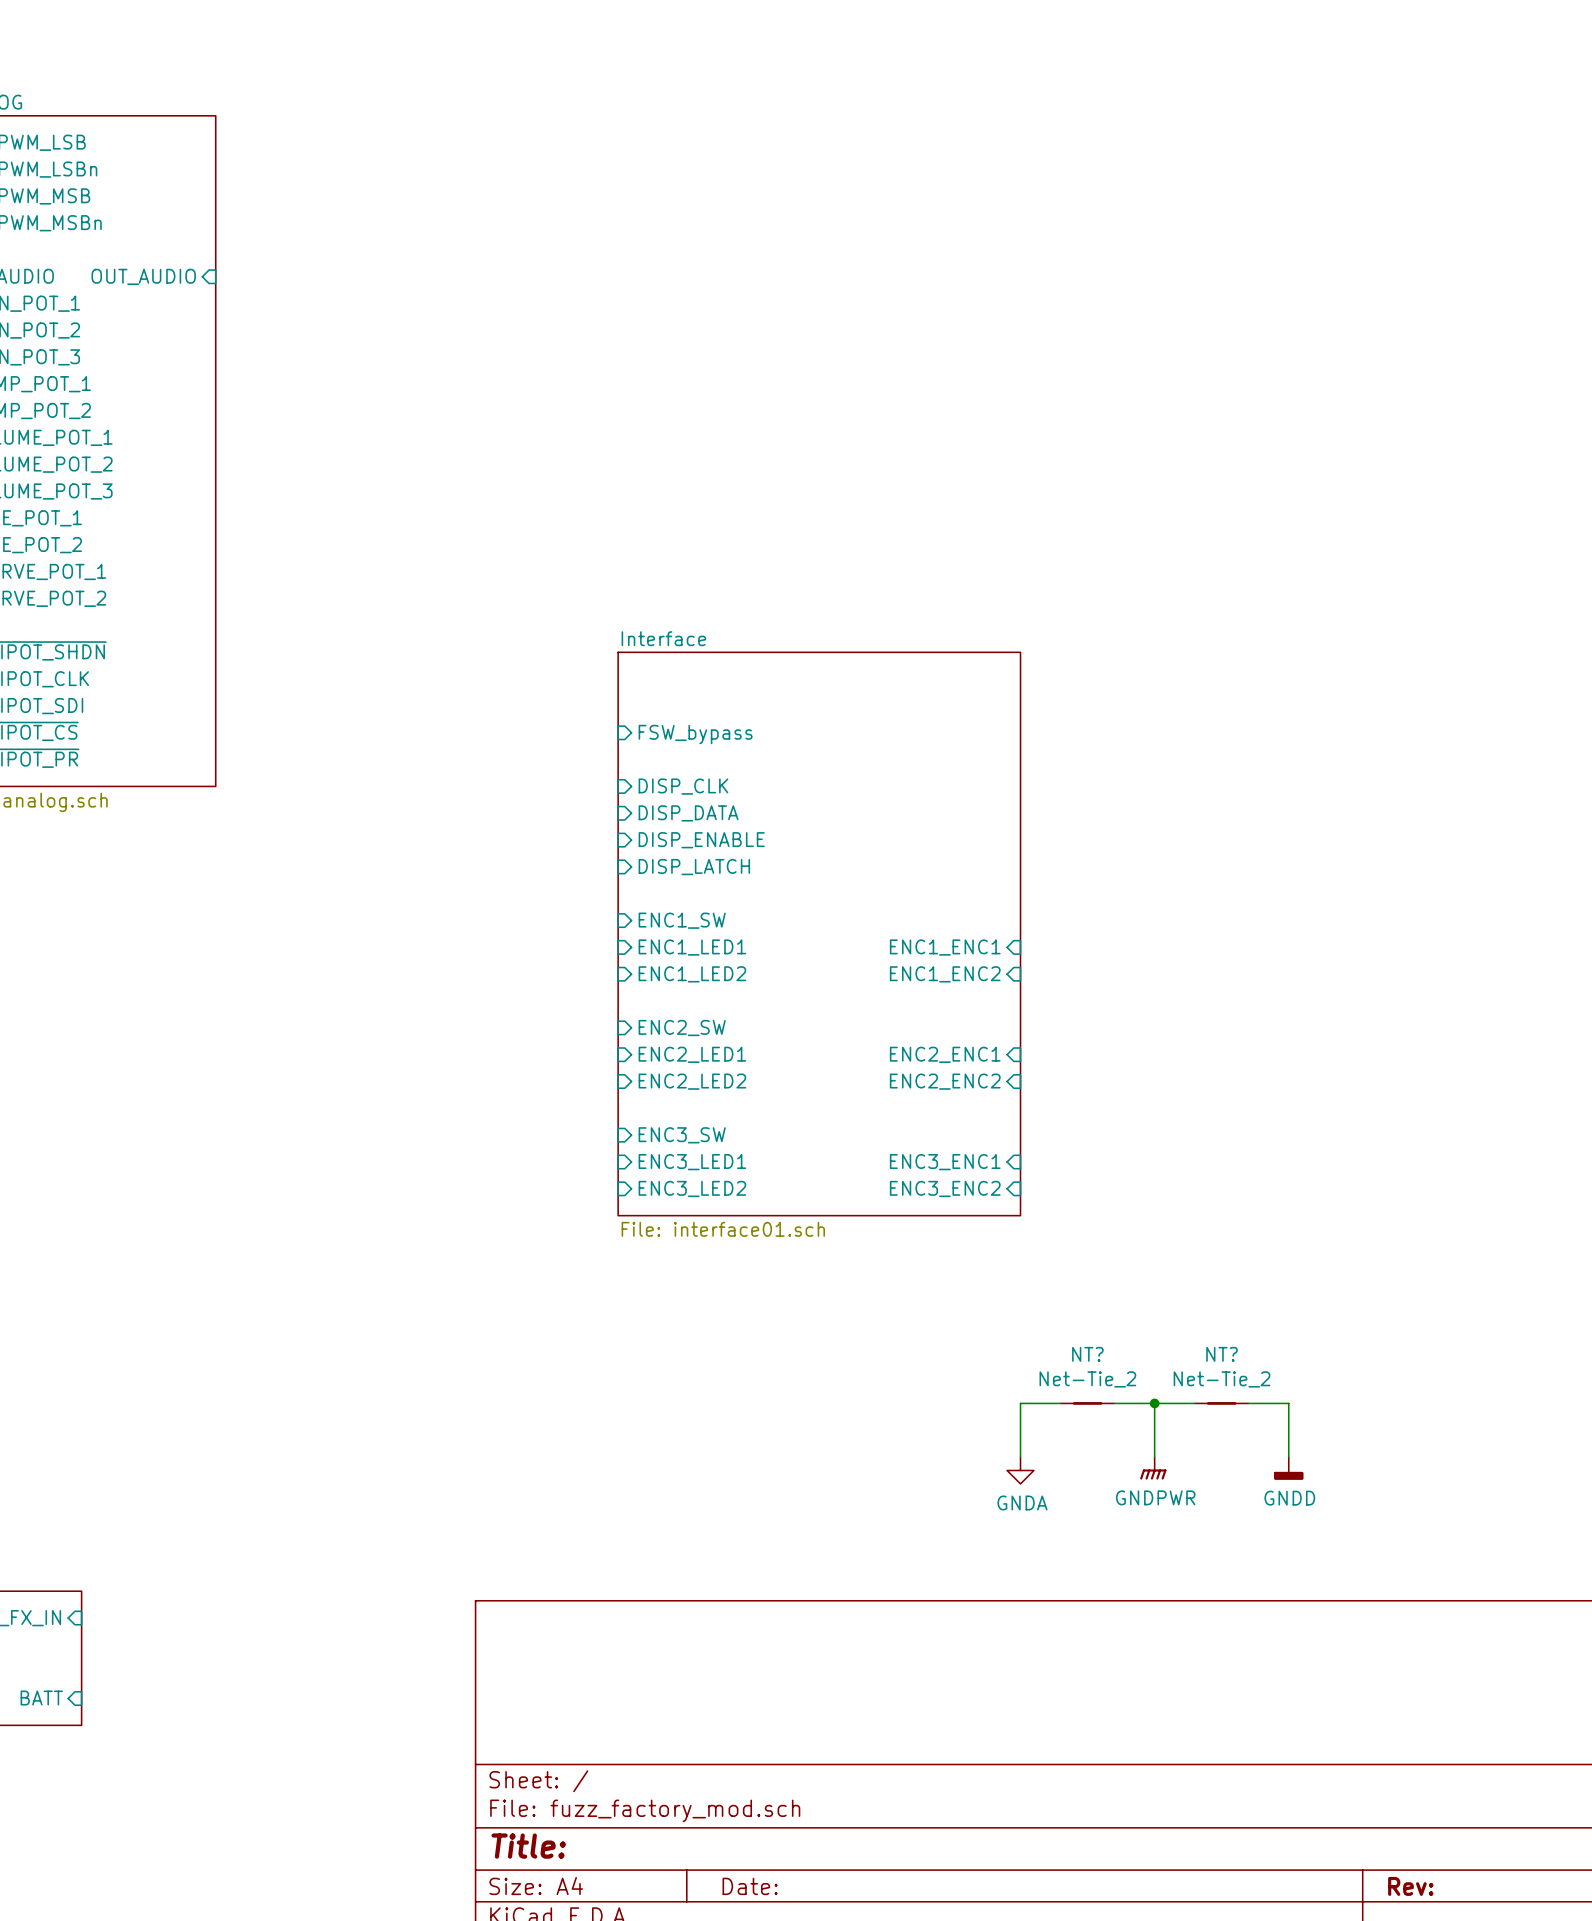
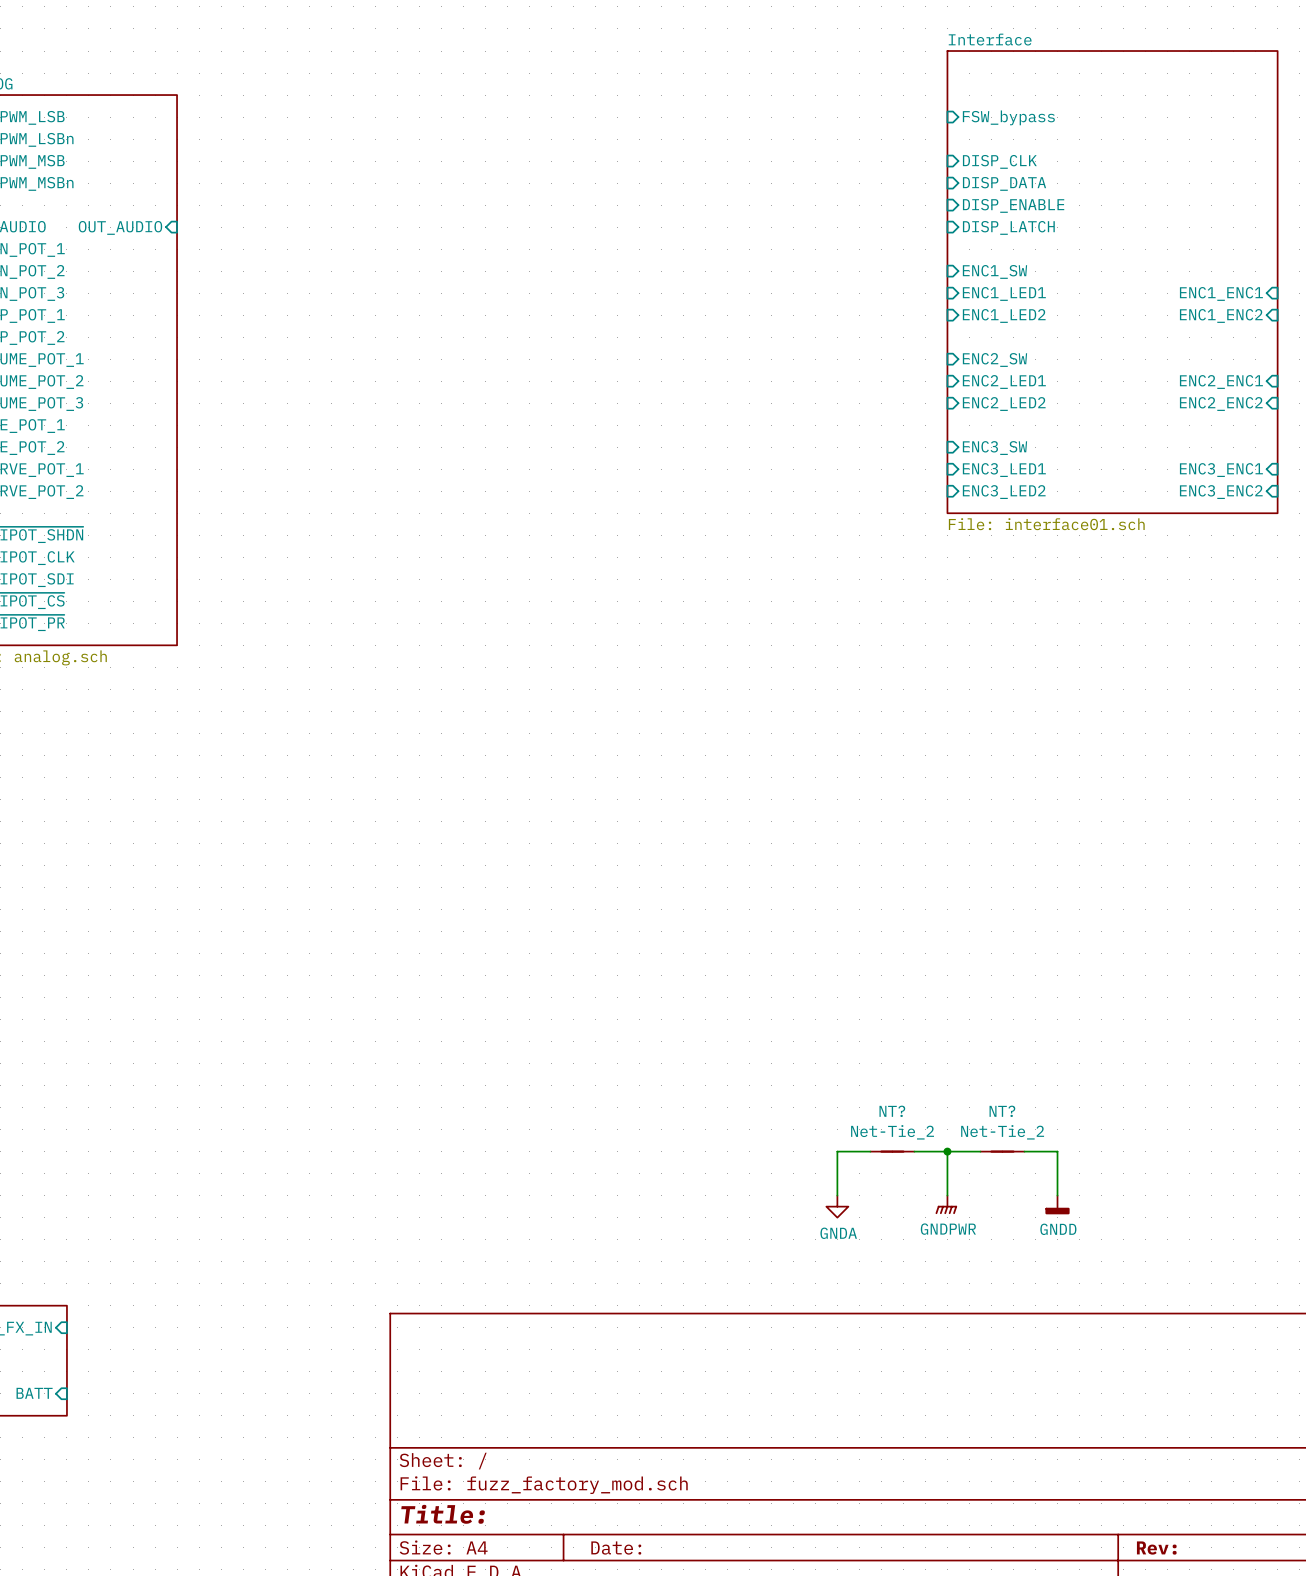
sheet pin: none -> FSW_bypass (1008, 117)
sheet pin: none -> DISP_CLK (999, 161)
sheet pin: none -> DISP_DATA (1004, 183)
sheet pin: none -> DISP_ENABLE (1013, 205)
sheet pin: none -> DISP_LATCH (1008, 227)
sheet pin: none -> ENC1_SW (994, 271)
sheet Interface: none -> File: interface01.sch (1112, 282)
sheet pin: none -> ENC1_LED1 (1004, 293)
sheet pin: none -> ENC1_ENC1 (1221, 293)
sheet pin: none -> ENC1_LED2 (1004, 315)
sheet pin: none -> ENC1_ENC2 (1221, 315)
sheet pin: none -> ENC2_SW (994, 359)
sheet pin: none -> ENC2_LED1 (1004, 382)
sheet pin: none -> ENC2_ENC1 (1221, 382)
sheet pin: none -> ENC2_LED2 (1004, 404)
sheet pin: none -> ENC2_ENC2 (1221, 404)
sheet pin: none -> ENC3_SW (994, 448)
sheet pin: none -> ENC3_LED1 (1004, 470)
sheet pin: none -> ENC3_ENC1 (1221, 470)
sheet pin: none -> ENC3_LED2 (1004, 492)
sheet pin: none -> ENC3_ENC2 (1221, 492)
sheet pin: FSW_bypass (695, 734) -> none
sheet pin: DISP_CLK (683, 786) -> none
sheet pin: DISP_DATA (688, 813) -> none
sheet pin: DISP_ENABLE (701, 840) -> none
sheet pin: DISP_LATCH (694, 867) -> none
sheet pin: ENC1_SW (682, 920) -> none
sheet Interface: File: interface01.sch (819, 933) -> none
sheet pin: ENC1_LED1 (692, 947) -> none
sheet pin: ENC1_ENC1 (945, 947) -> none
sheet pin: ENC1_LED2 (692, 974) -> none
sheet pin: ENC1_ENC2 (945, 974) -> none
sheet pin: ENC2_SW (682, 1028) -> none
sheet pin: ENC2_LED1 (692, 1054) -> none
sheet pin: ENC2_ENC1 (945, 1054) -> none
sheet pin: ENC2_LED2 (692, 1081) -> none
sheet pin: ENC2_ENC2 (945, 1081) -> none
sheet pin: ENC3_SW (682, 1135) -> none
sheet pin: ENC3_LED1 (692, 1162) -> none
sheet pin: ENC3_ENC1 (945, 1162) -> none
sheet pin: ENC3_LED2 (692, 1188) -> none
sheet pin: ENC3_ENC2 (945, 1188) -> none

